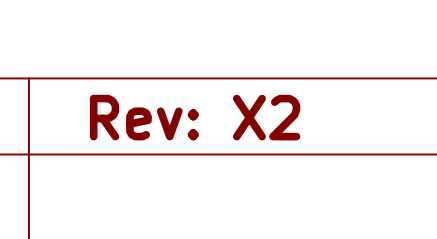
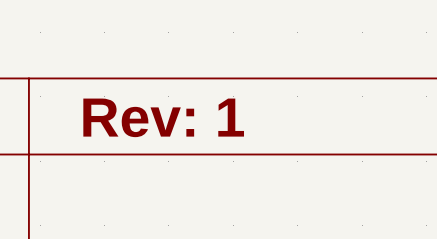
title block: Rev: X2 (195, 117) -> Rev: 1 (163, 117)

